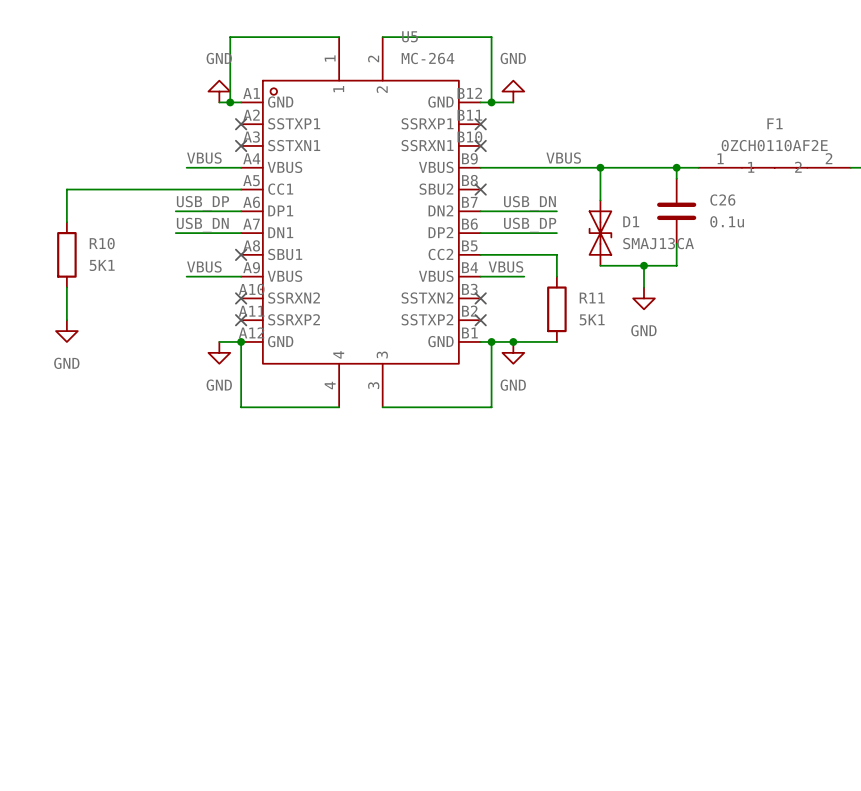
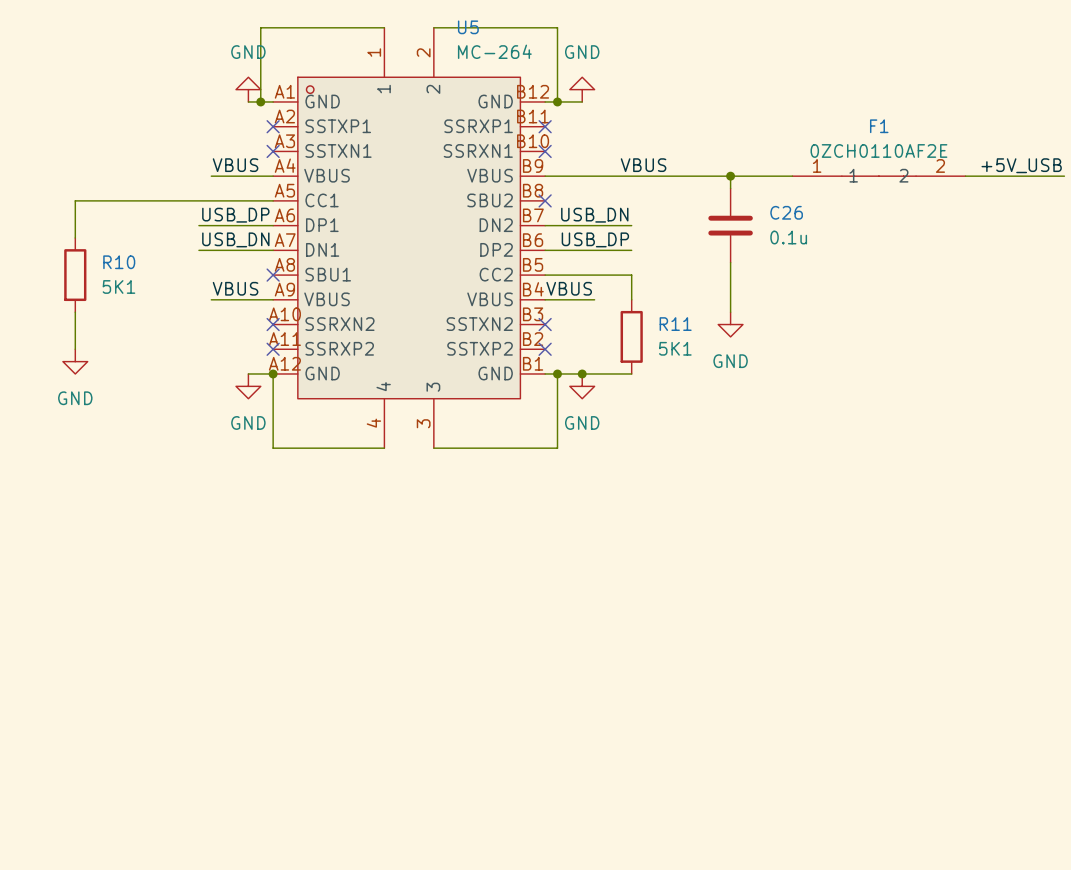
wire: (600, 167) (600, 200) -> none
junction: (600, 167) -> none
junction: none -> (730, 176)
wire: (676, 167) (676, 178) -> (730, 176) (730, 188)
junction: (676, 167) -> none
C26 position: (676, 211) -> (730, 225)
D1: SMAJ13CA (600, 233) -> none
wire: none -> (730, 262) (730, 287)
wire: (676, 243) (676, 265) (600, 265) -> none
junction: (644, 265) -> none

